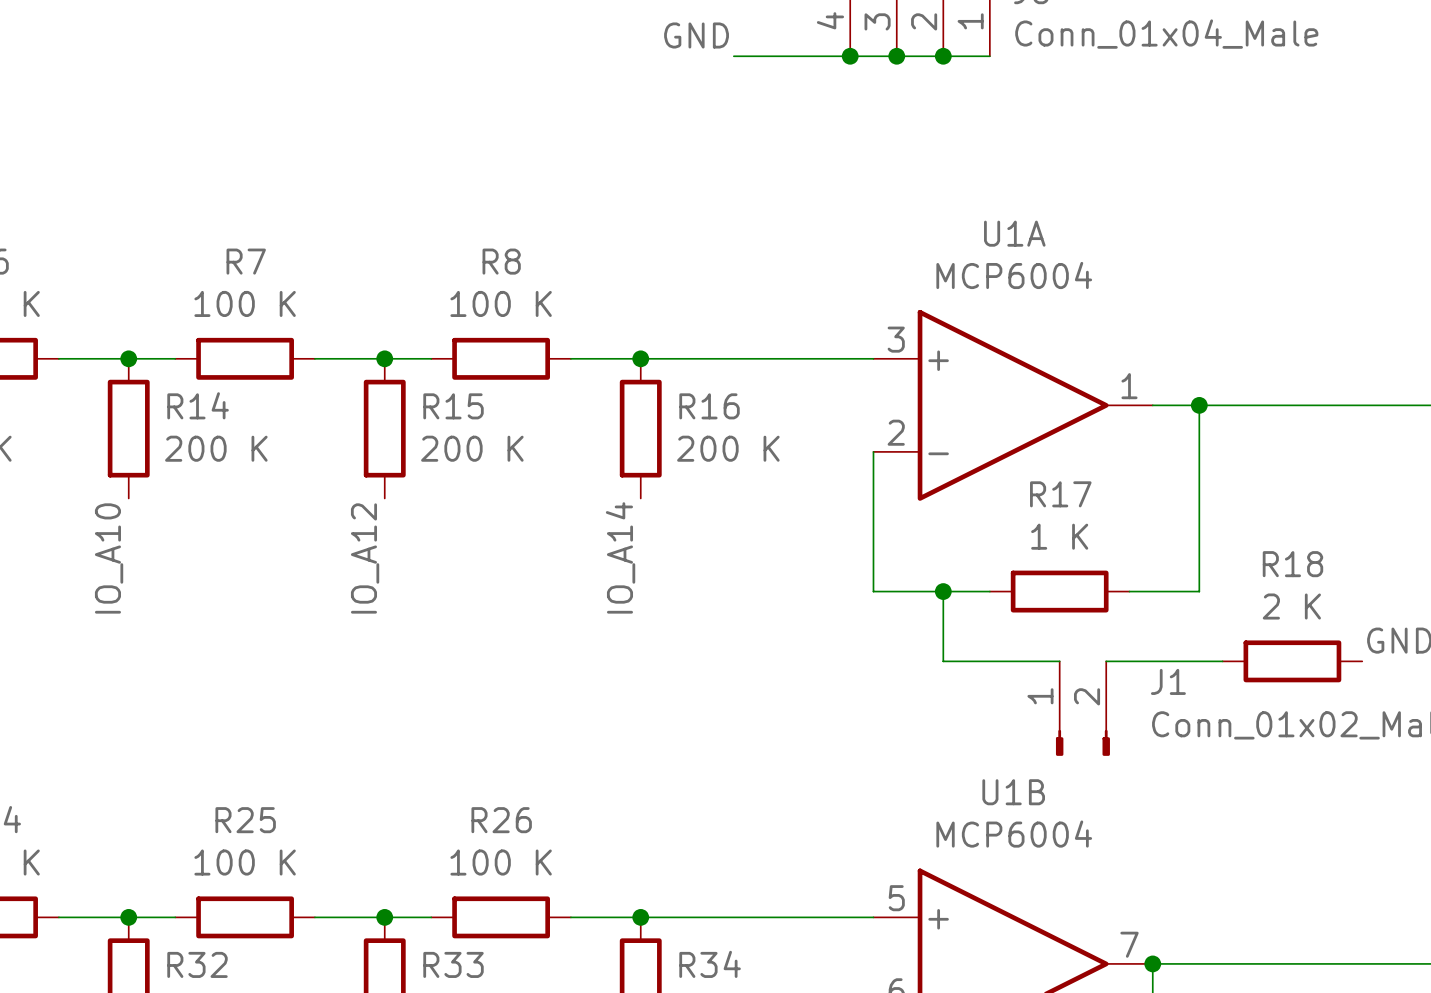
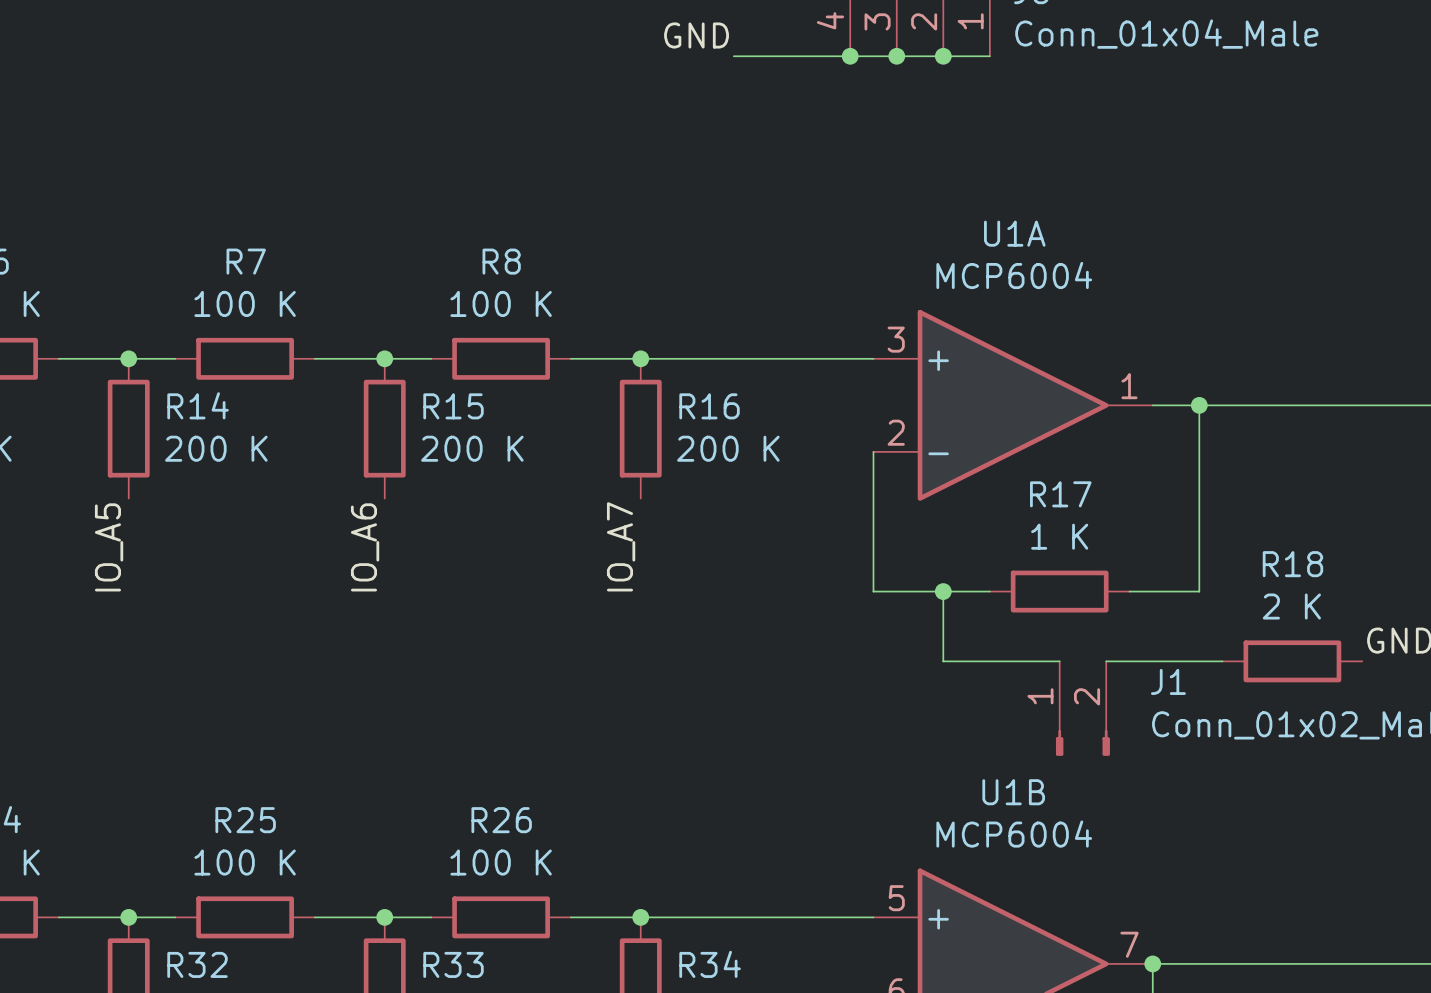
label: IO_A14 (620, 557) -> IO_A7 (621, 546)
label: IO_A10 (109, 558) -> IO_A5 (109, 547)
label: IO_A12 (365, 558) -> IO_A6 (365, 547)

